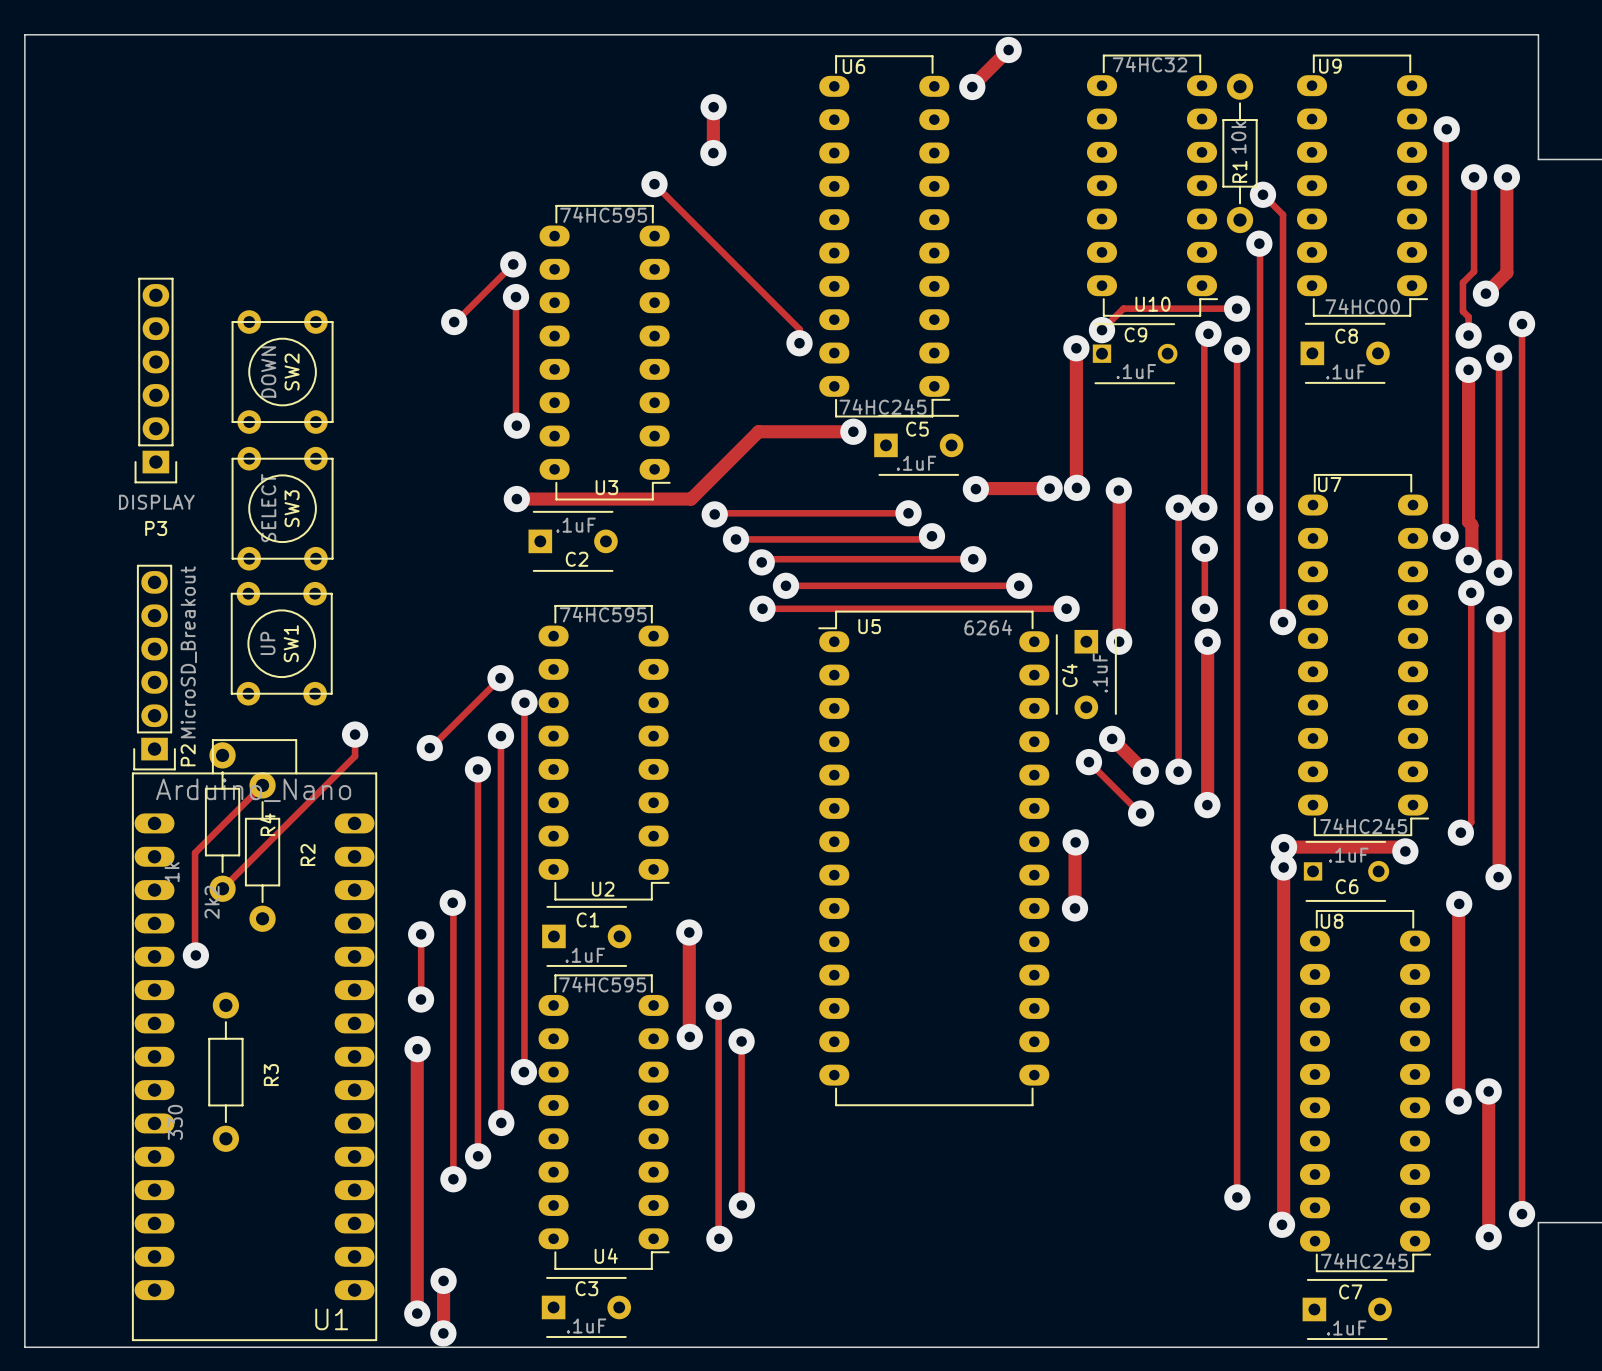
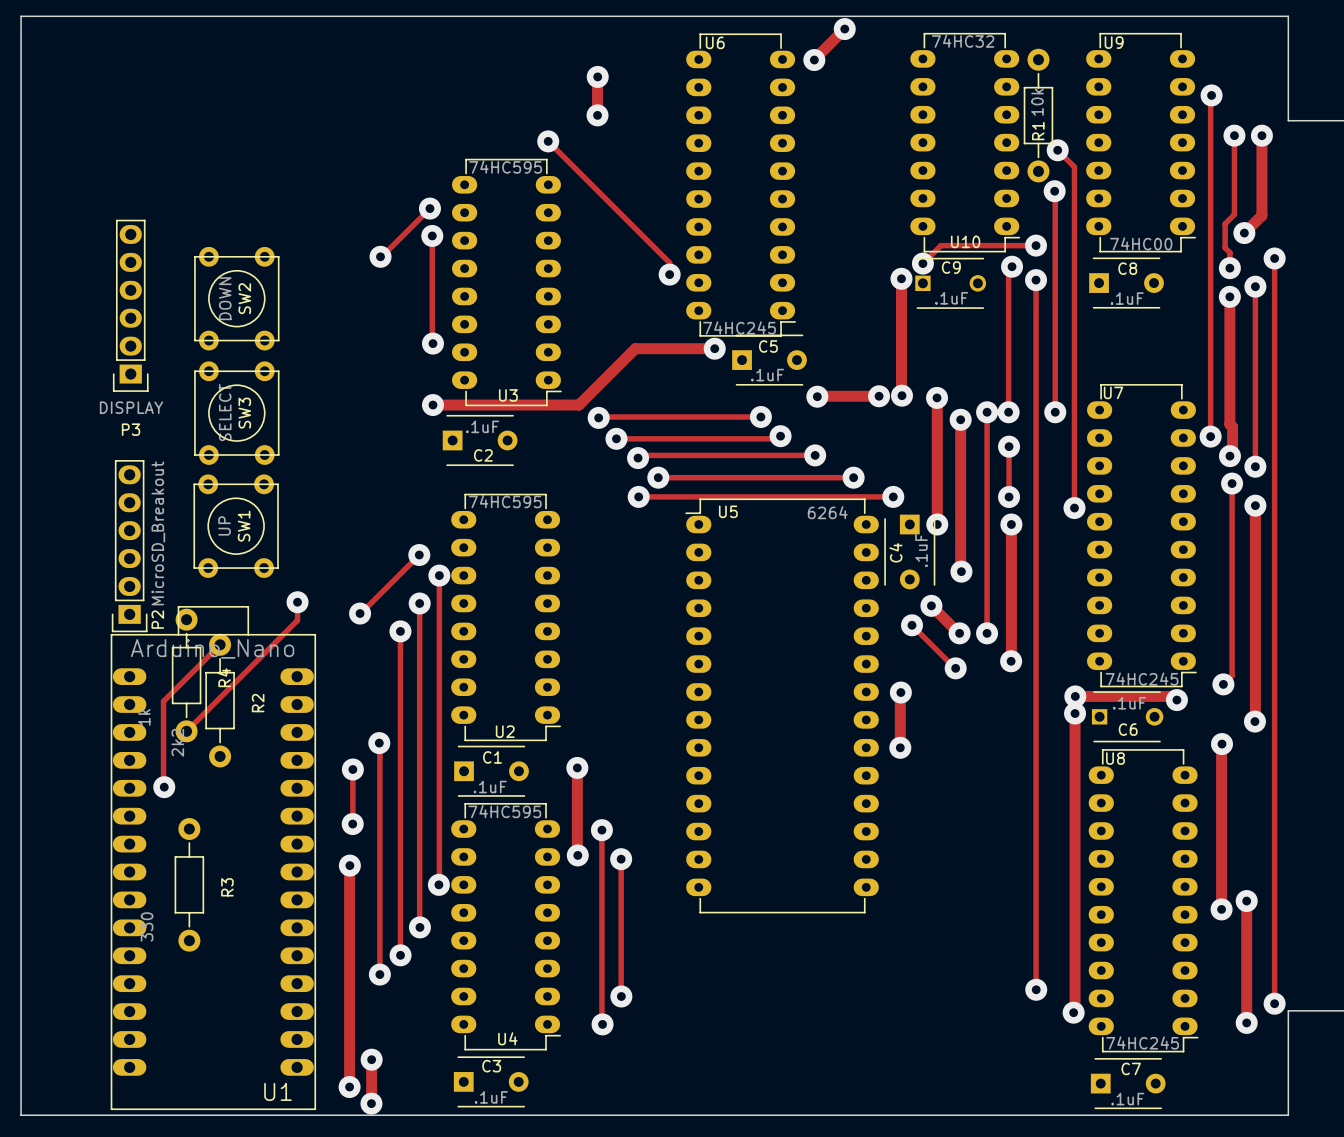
track: none -> (960, 419) (961, 571)
via: none -> (960, 419)
via: none -> (961, 571)

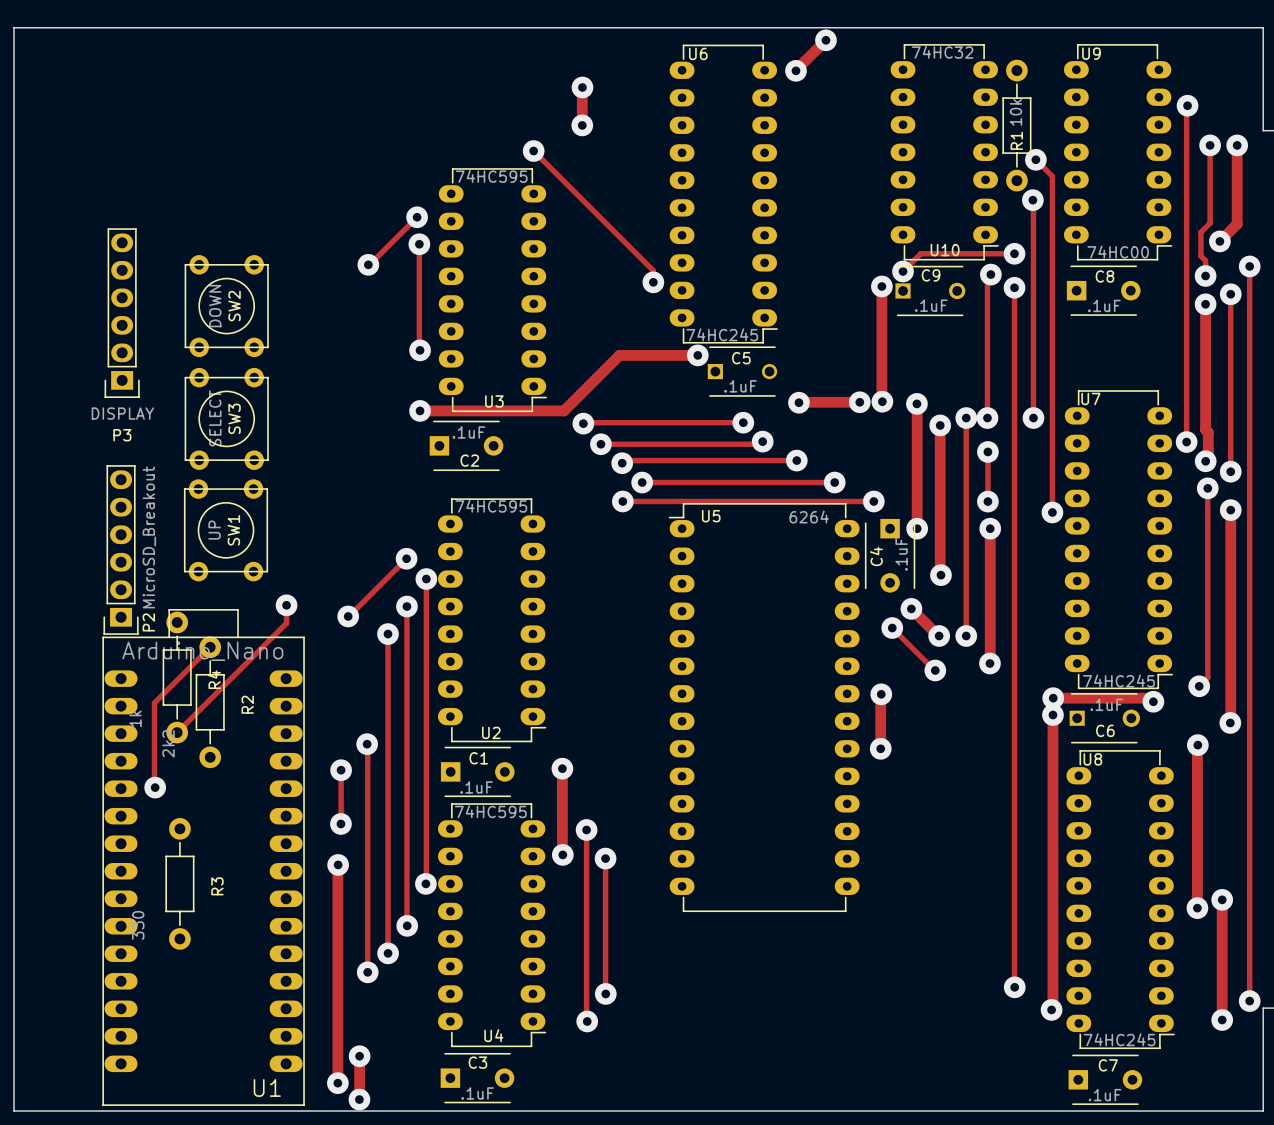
C5 footprint: [732, 334, 807, 386] -> [707, 346, 778, 397]

